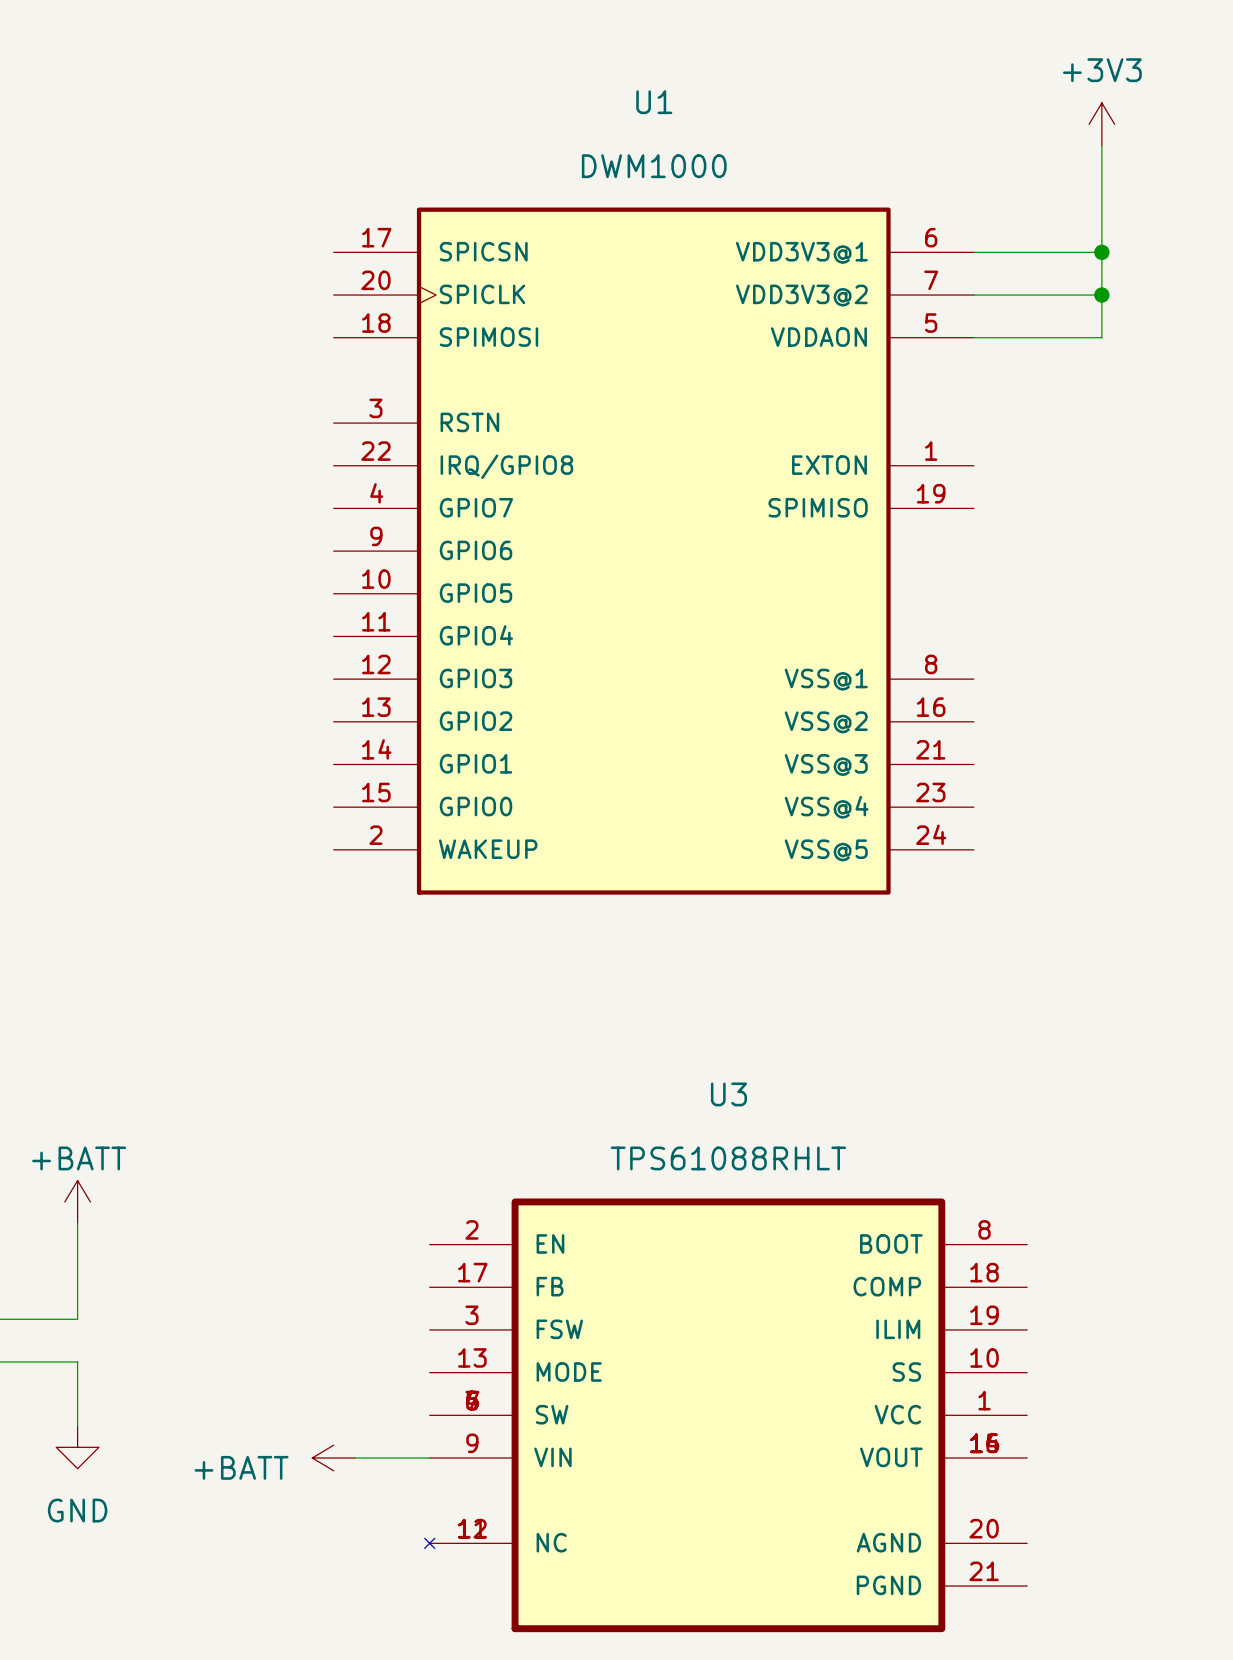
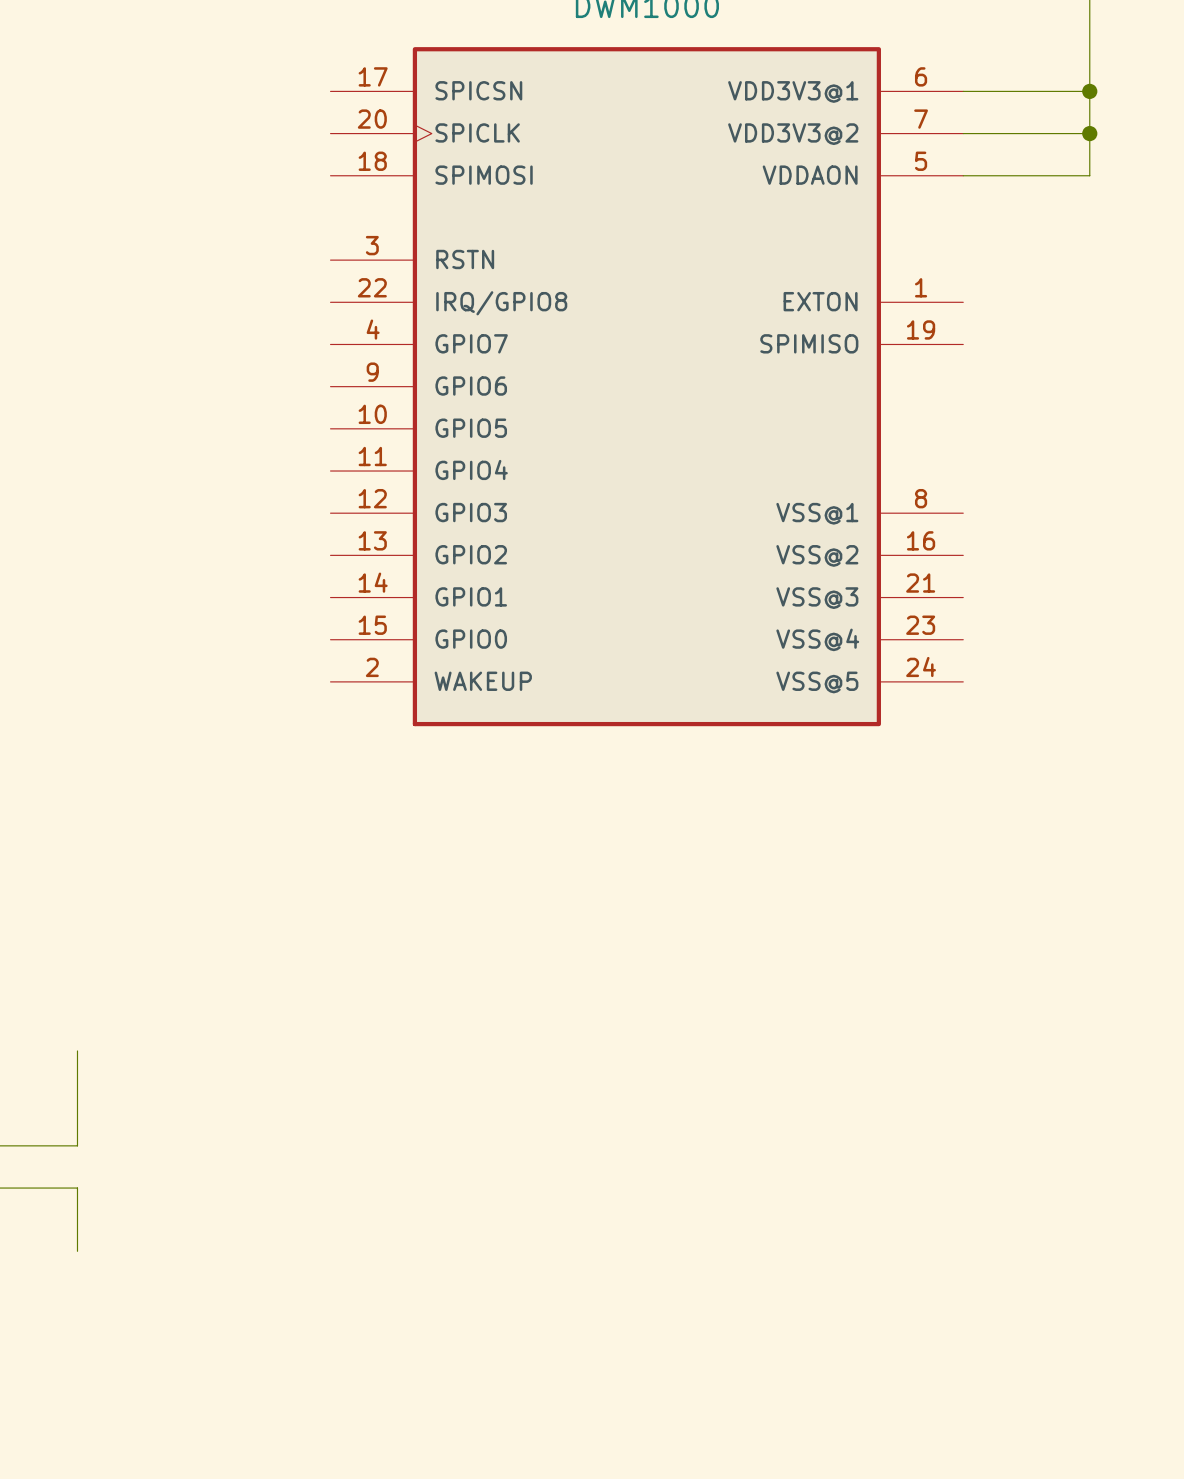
power symbol: +BATT (77, 1201) -> none
U3: TPS61088RHLT (725, 1415) -> none
power symbol: GND (77, 1447) -> none
power symbol: +BATT (333, 1457) -> none
wire: (355, 1457) (429, 1457) -> none

